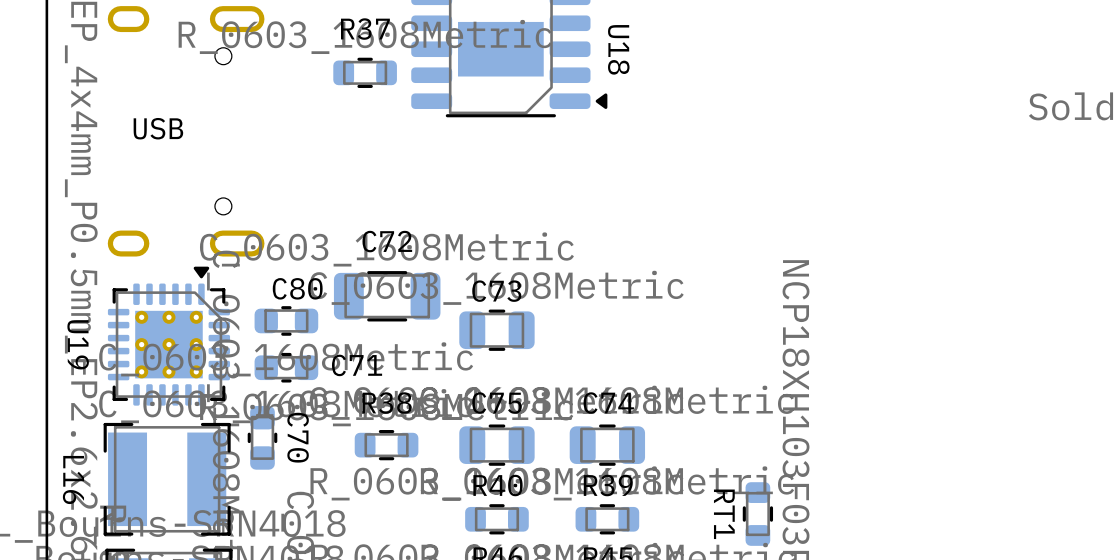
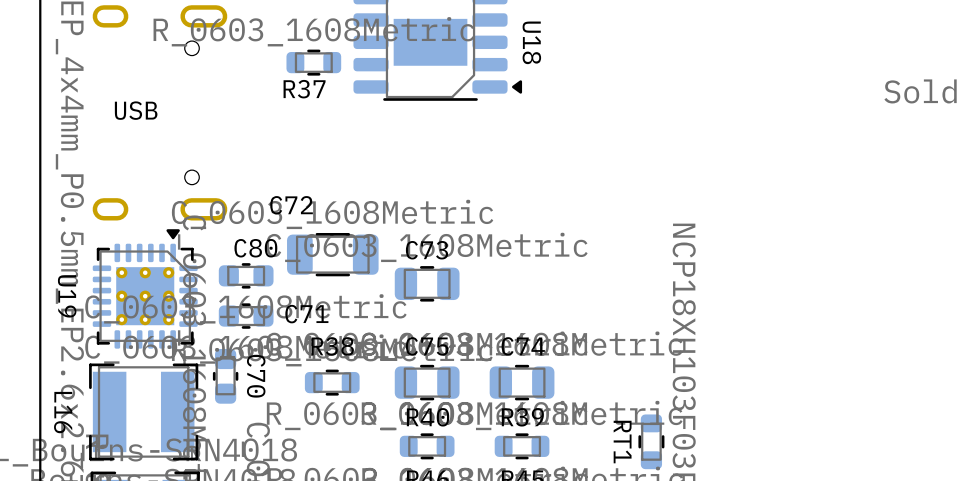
R37 name position: R37 (365, 29) -> R37 (304, 89)
C72 name position: C72 (387, 241) -> C72 (291, 205)

